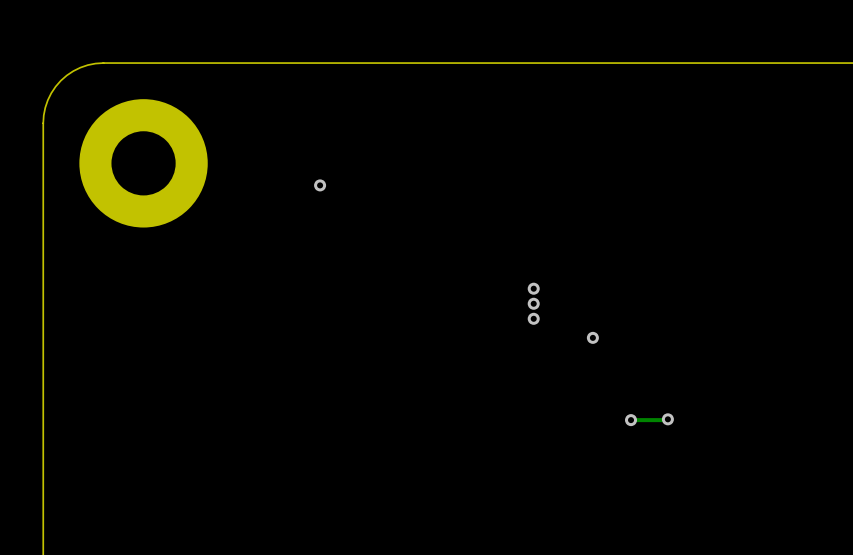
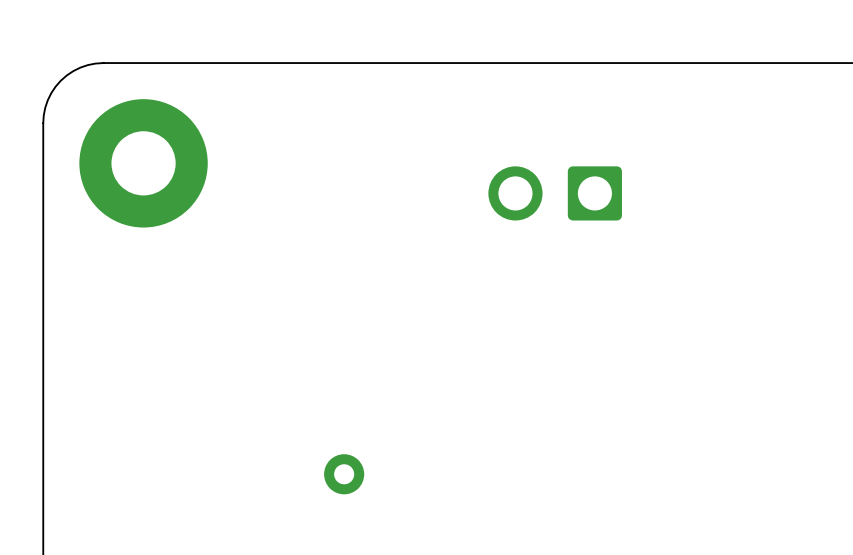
via: (320, 185) -> none
part: none -> (555, 193)
via: (533, 288) -> none
via: (533, 303) -> none
via: (533, 318) -> none
via: (592, 337) -> none
track: (667, 419) (631, 420) -> none
via: (667, 419) -> none
via: (631, 420) -> none
part: none -> (344, 474)

